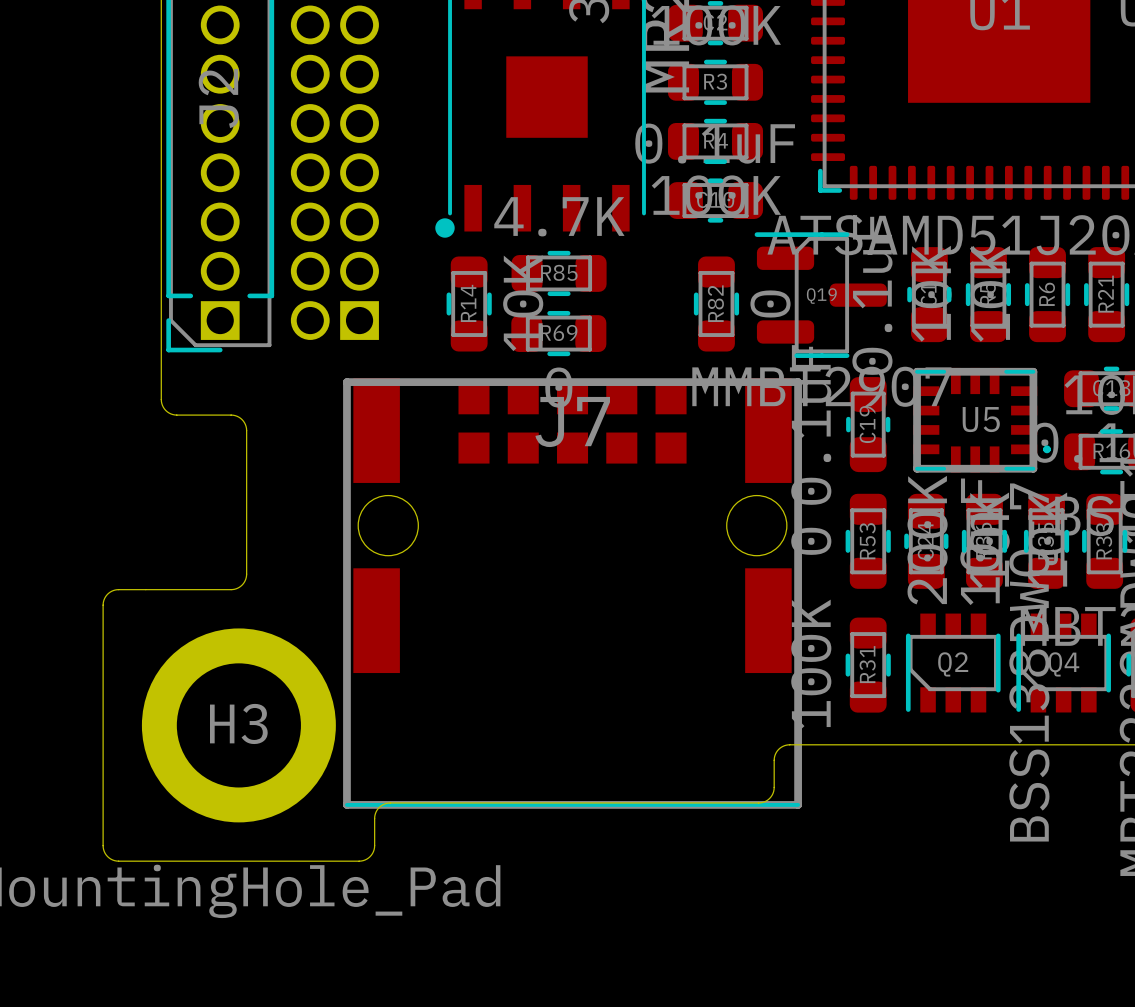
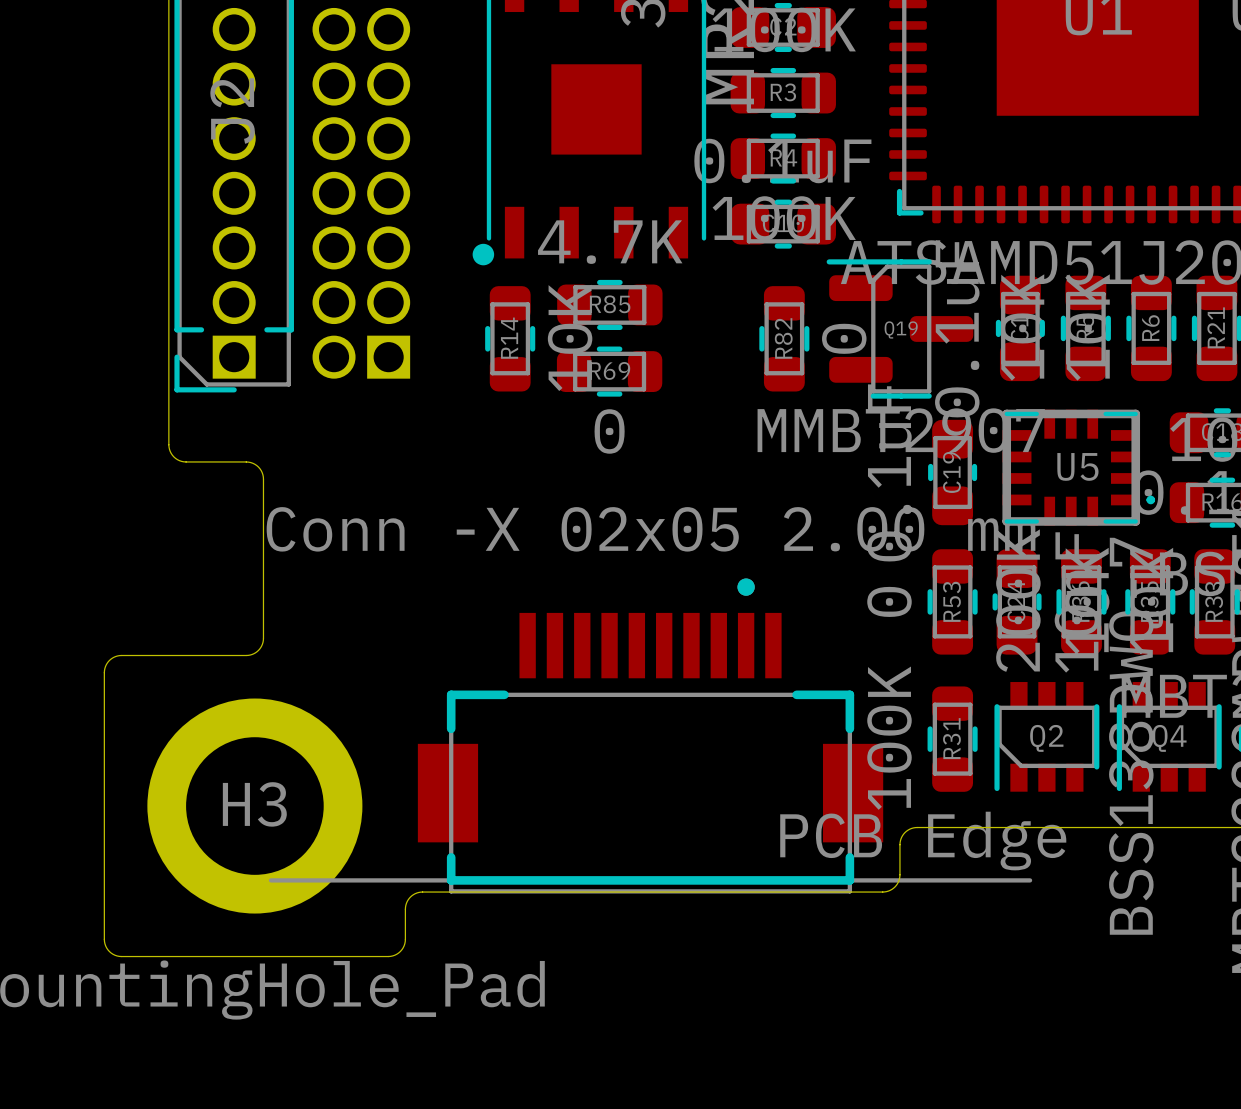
J7: (572, 593) -> none
part: none -> Conn -X 02x05 2.00 mm (650, 736)
board edge: (836, 744) (787, 744) (780, 748) (774, 758) (773, 793) (766, 800) (758, 802) -> (917, 827) (906, 831) (900, 839) (899, 876) (893, 888) (884, 891) (831, 892)

